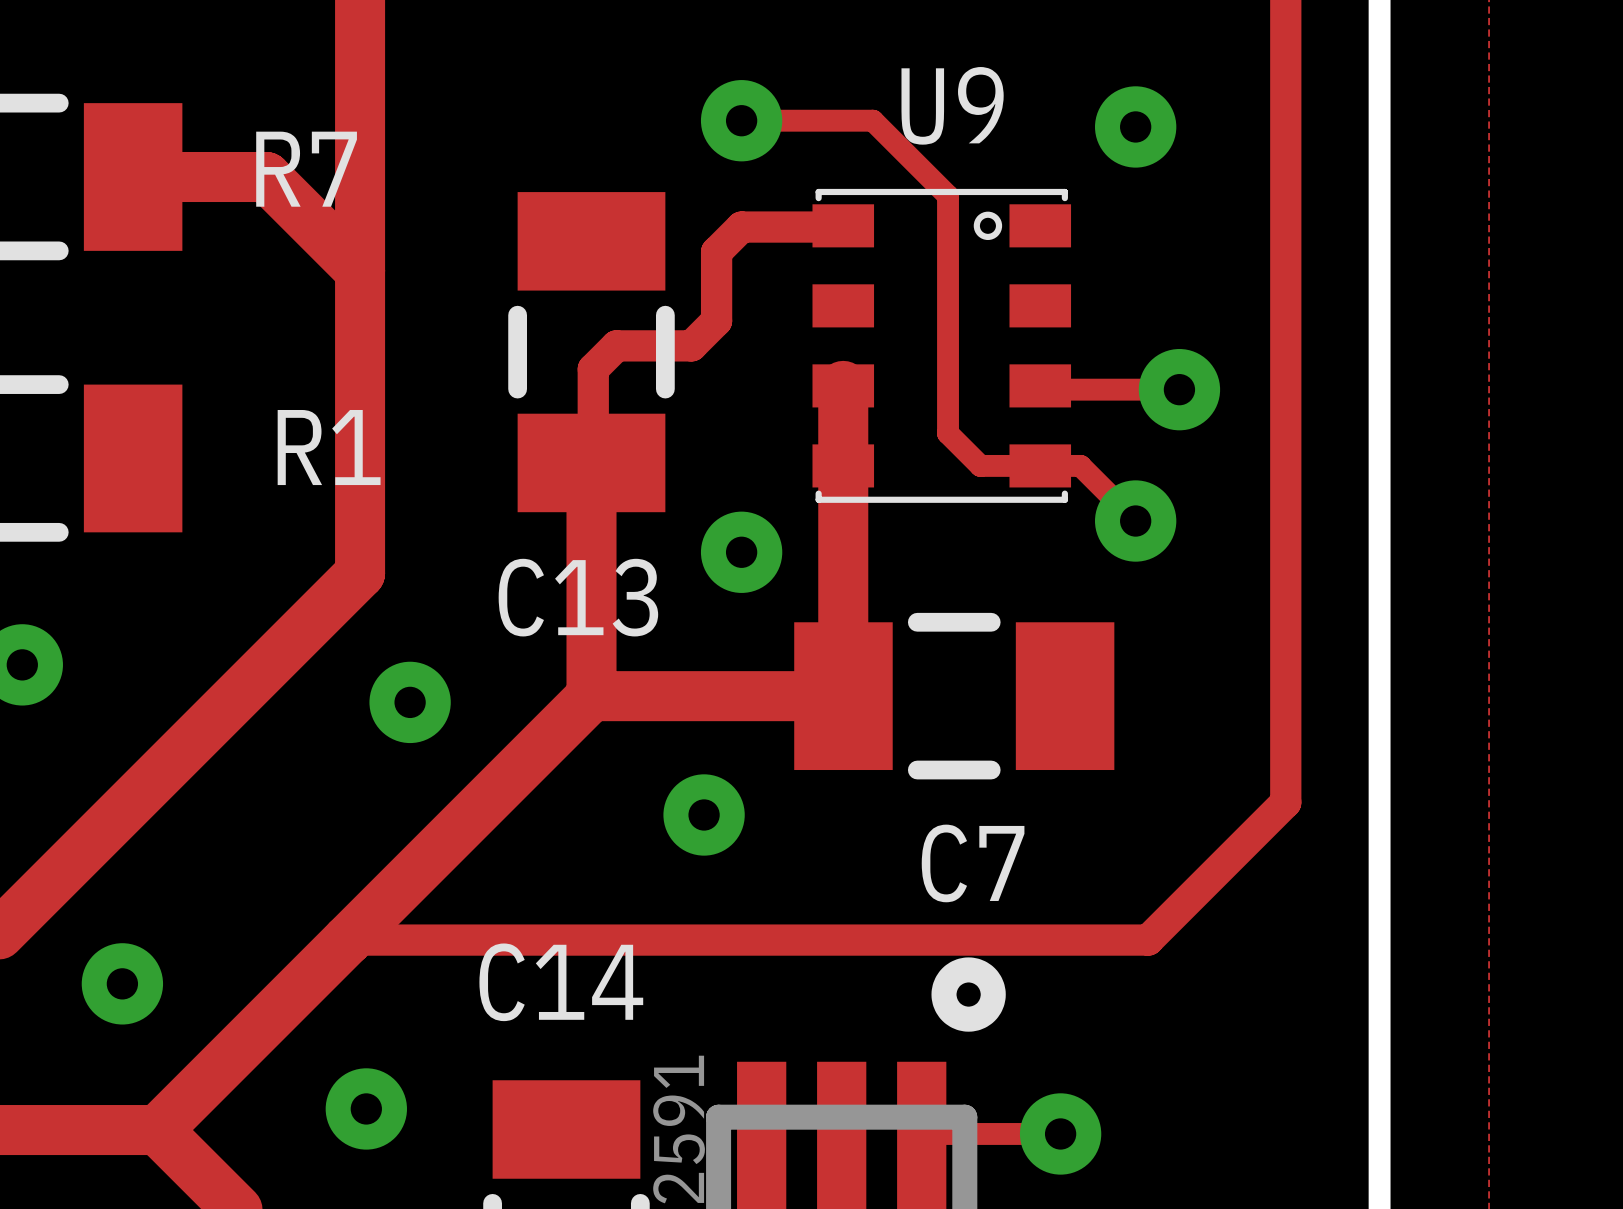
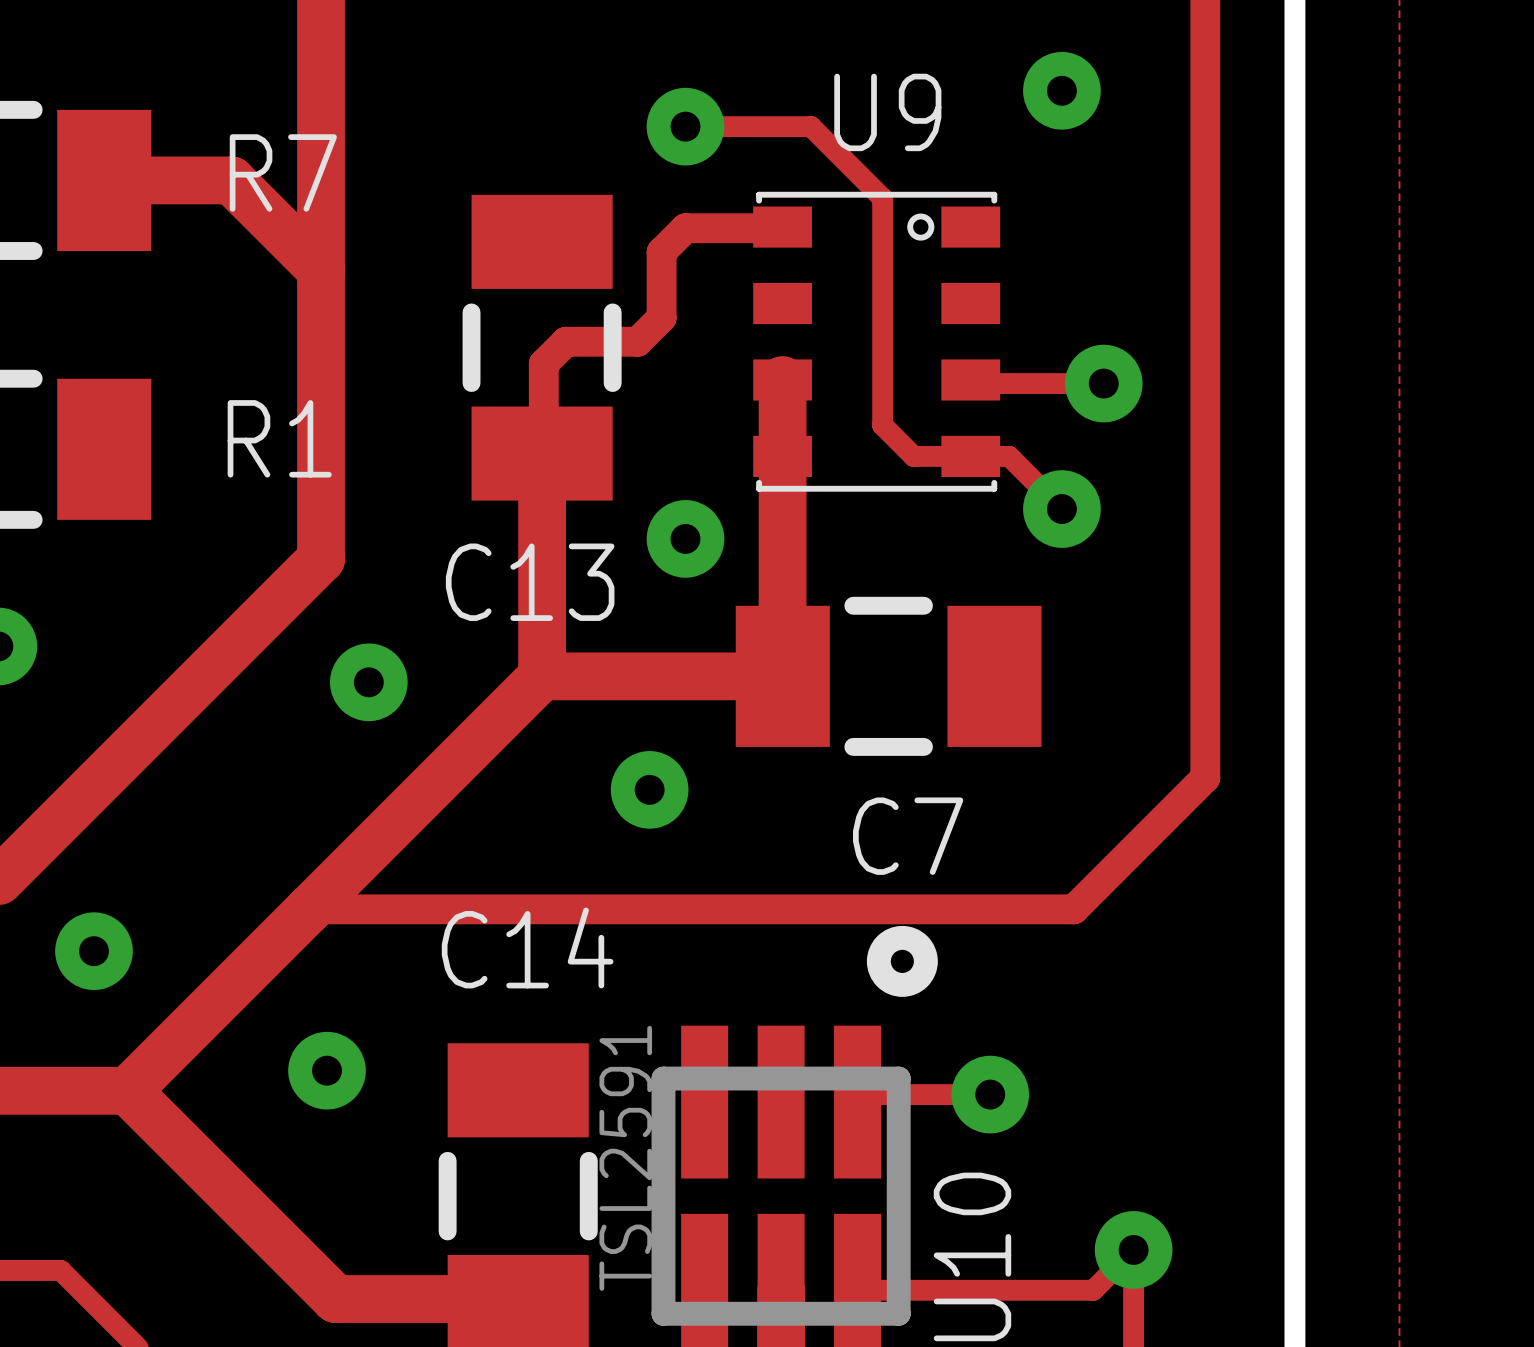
via position: (1135, 126) -> (1061, 90)

